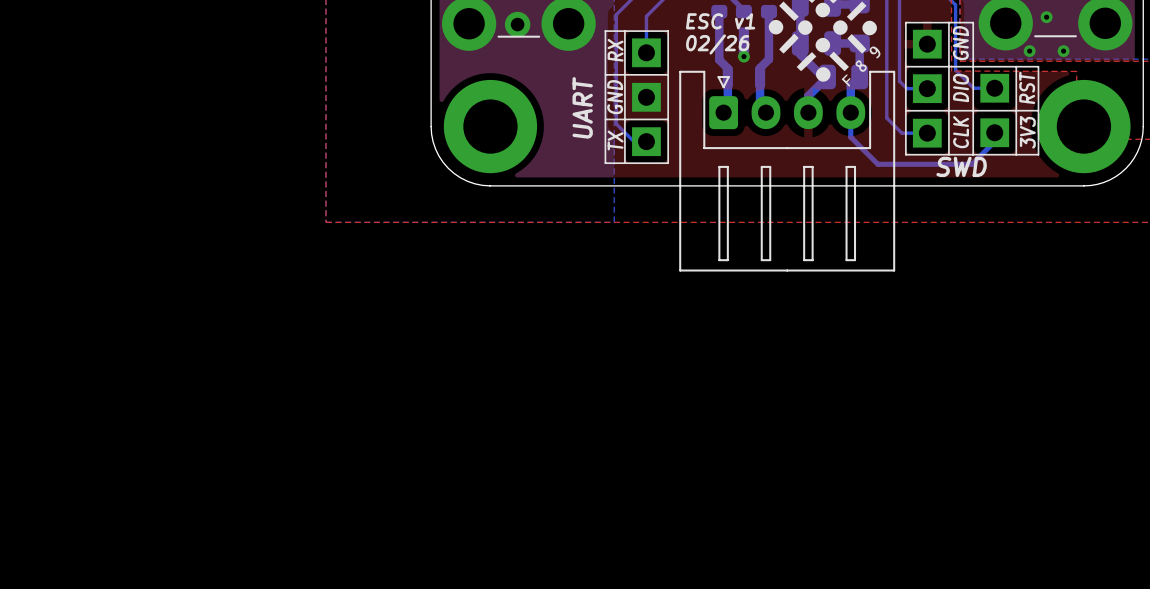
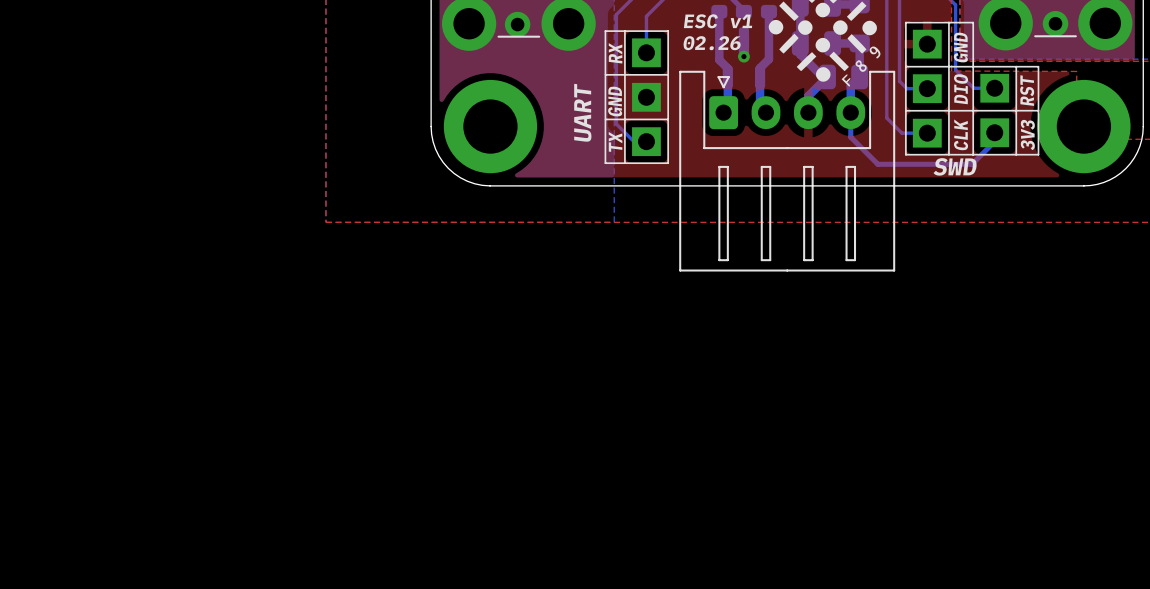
via size: [1040, 11, 1053, 24] -> [1042, 11, 1069, 37]
text: 02/26 (717, 44) -> 02.26 (711, 43)
via: (1029, 51) -> none
via: (1063, 51) -> none

